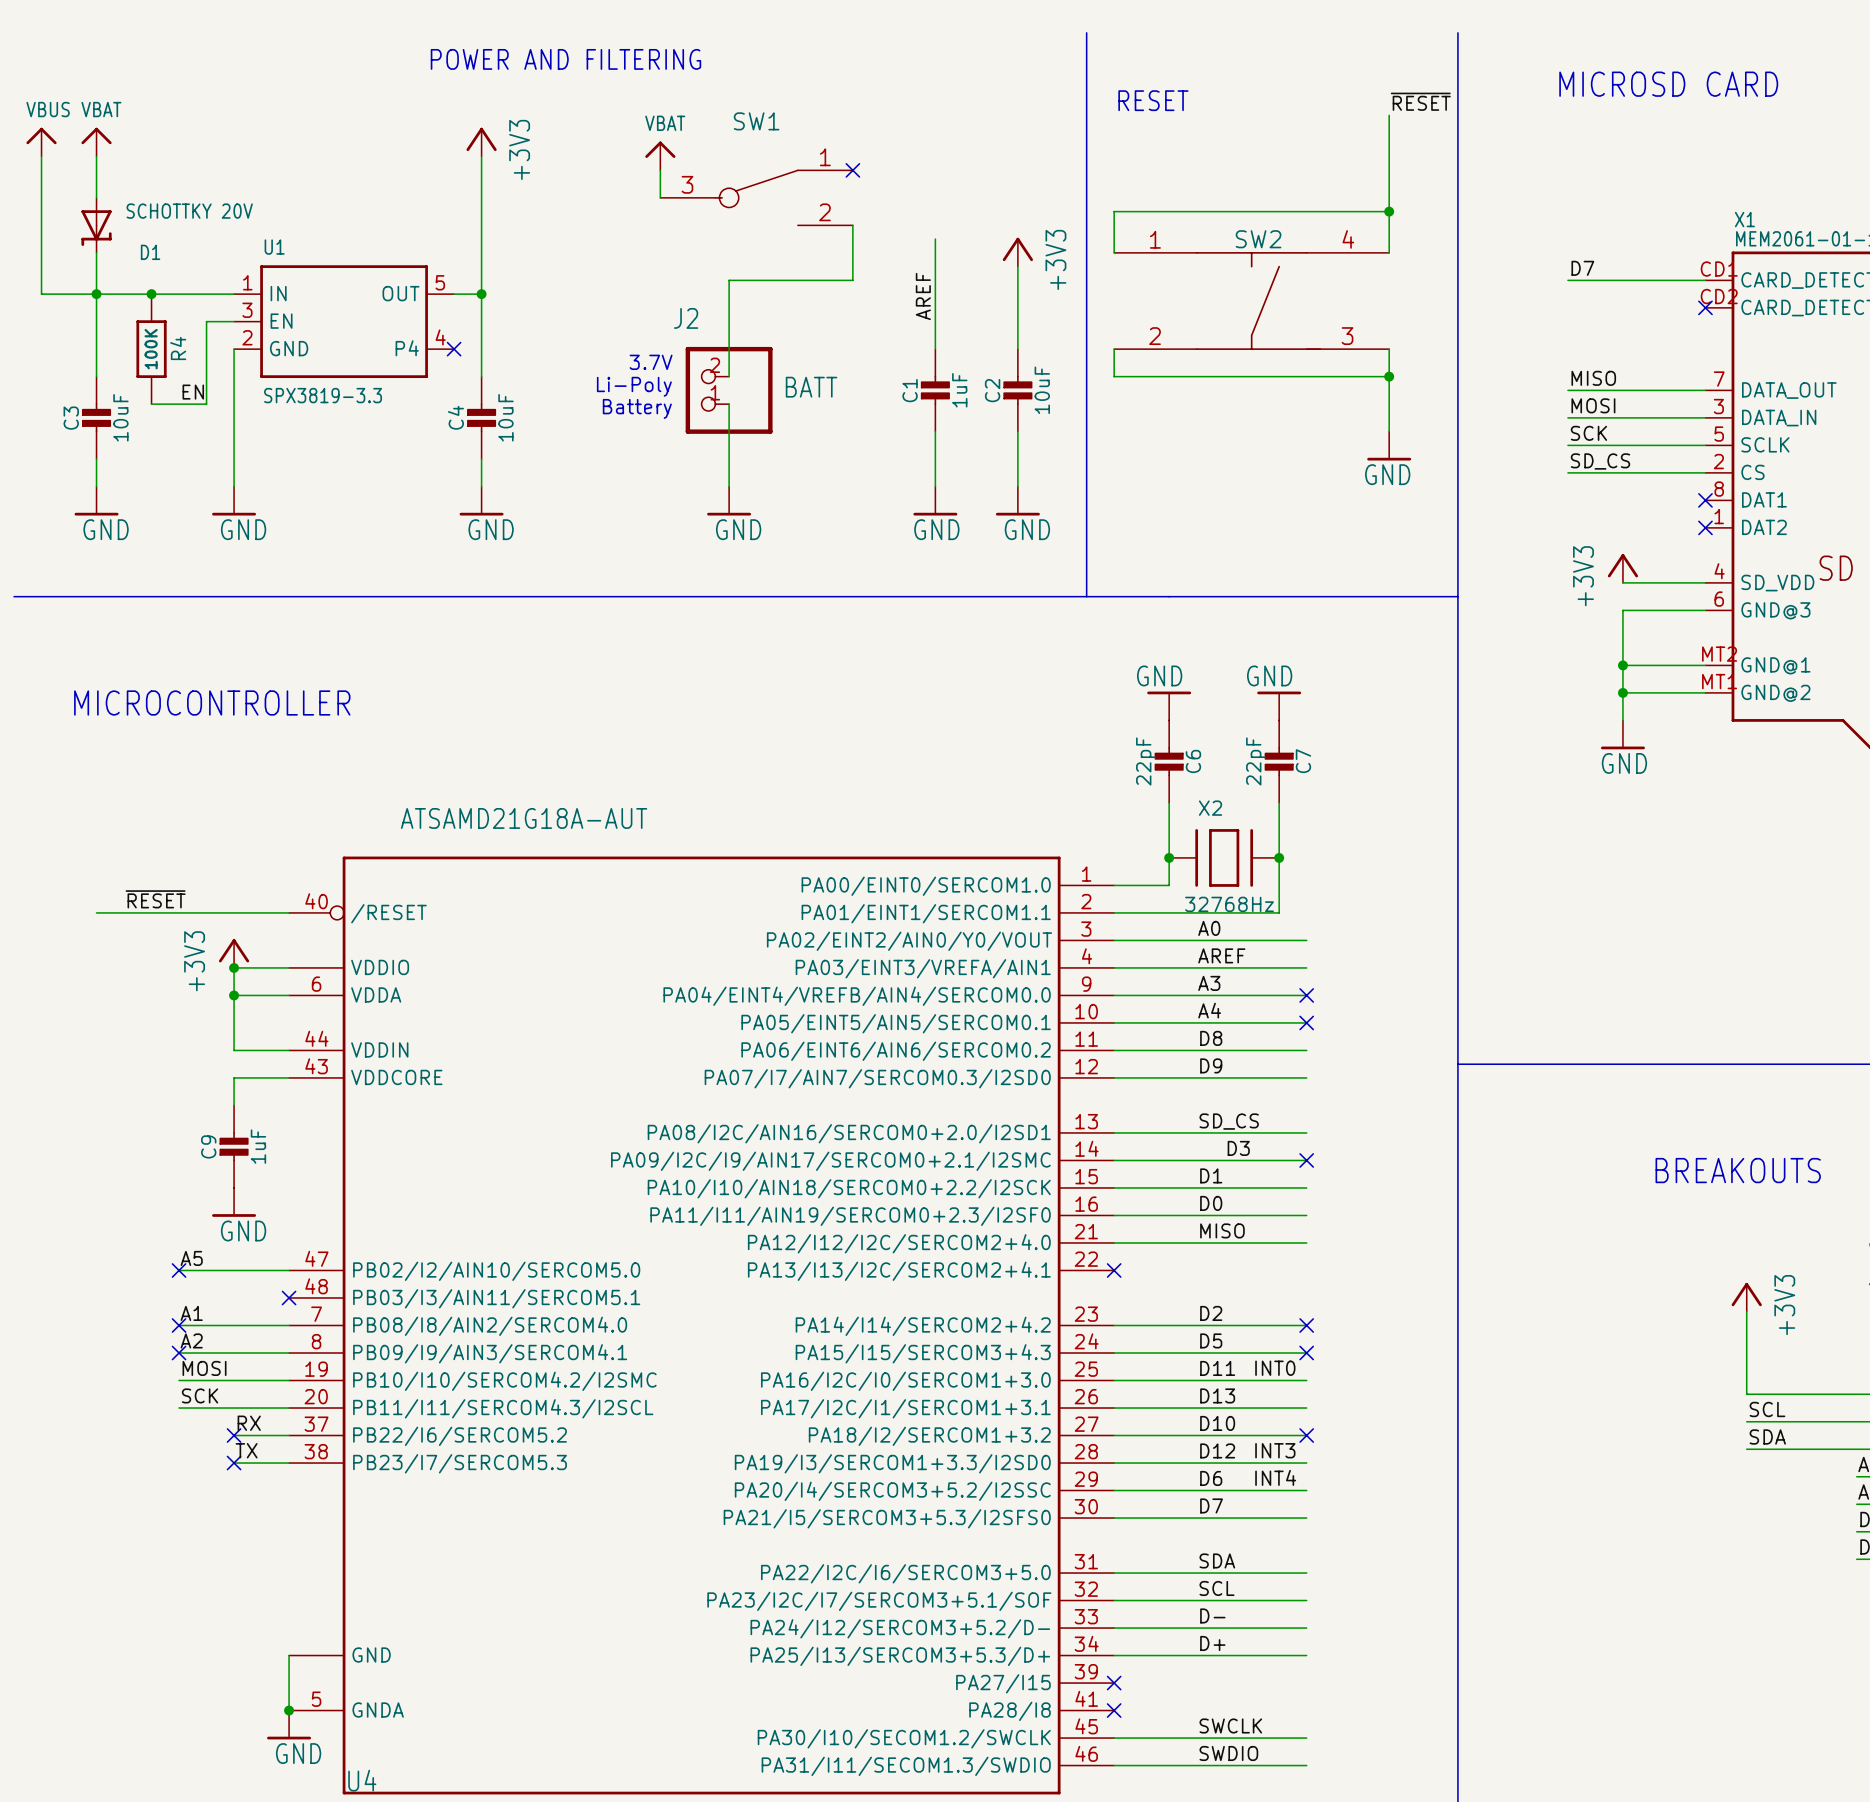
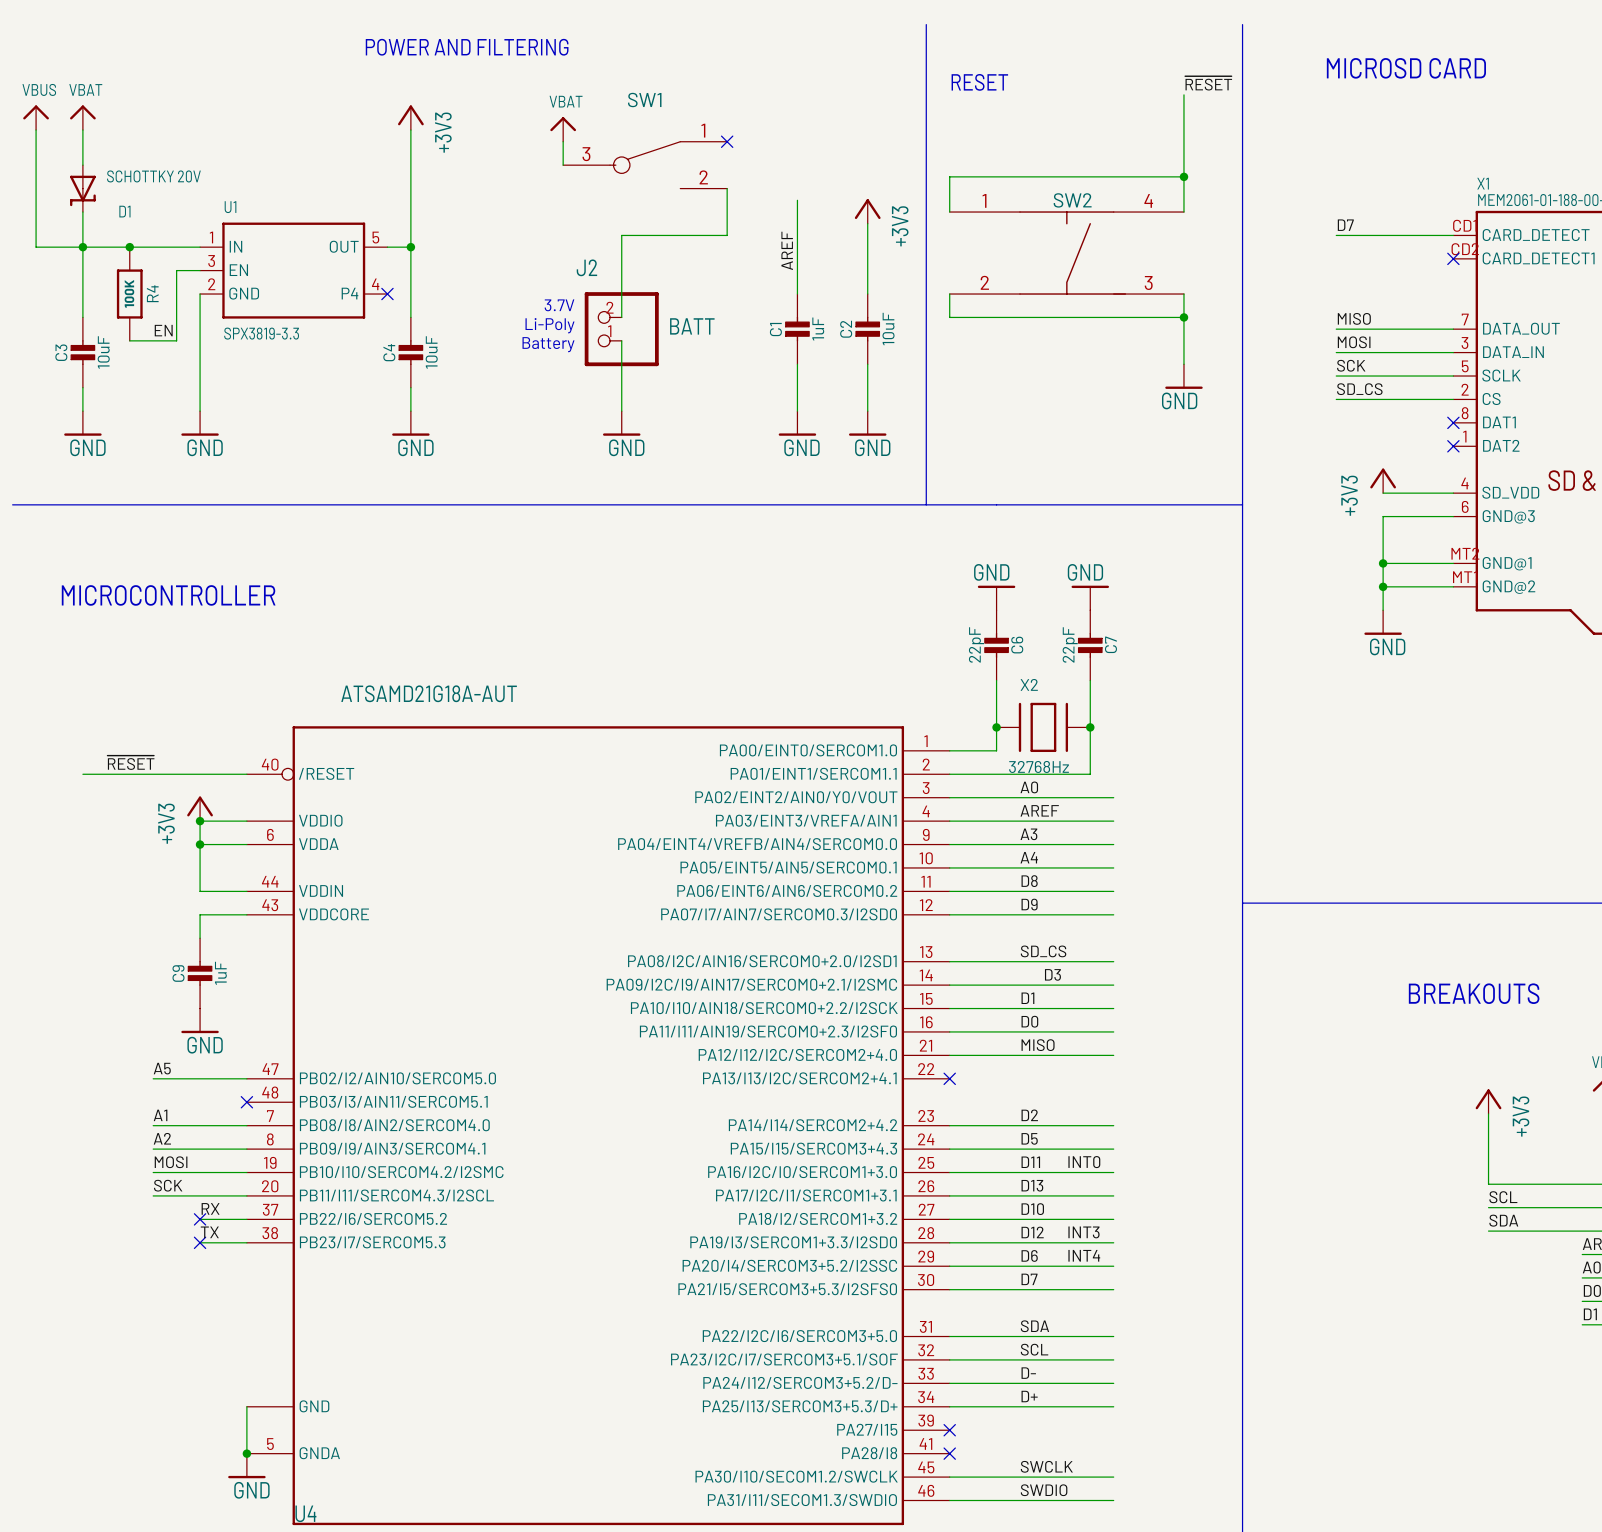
no-connect mark: (1306, 995) -> none
no-connect mark: (1306, 1022) -> none
no-connect mark: (1306, 1160) -> none
no-connect mark: (179, 1270) -> none
no-connect mark: (179, 1325) -> none
no-connect mark: (1306, 1325) -> none
no-connect mark: (179, 1353) -> none
no-connect mark: (1306, 1353) -> none
no-connect mark: (1306, 1435) -> none

